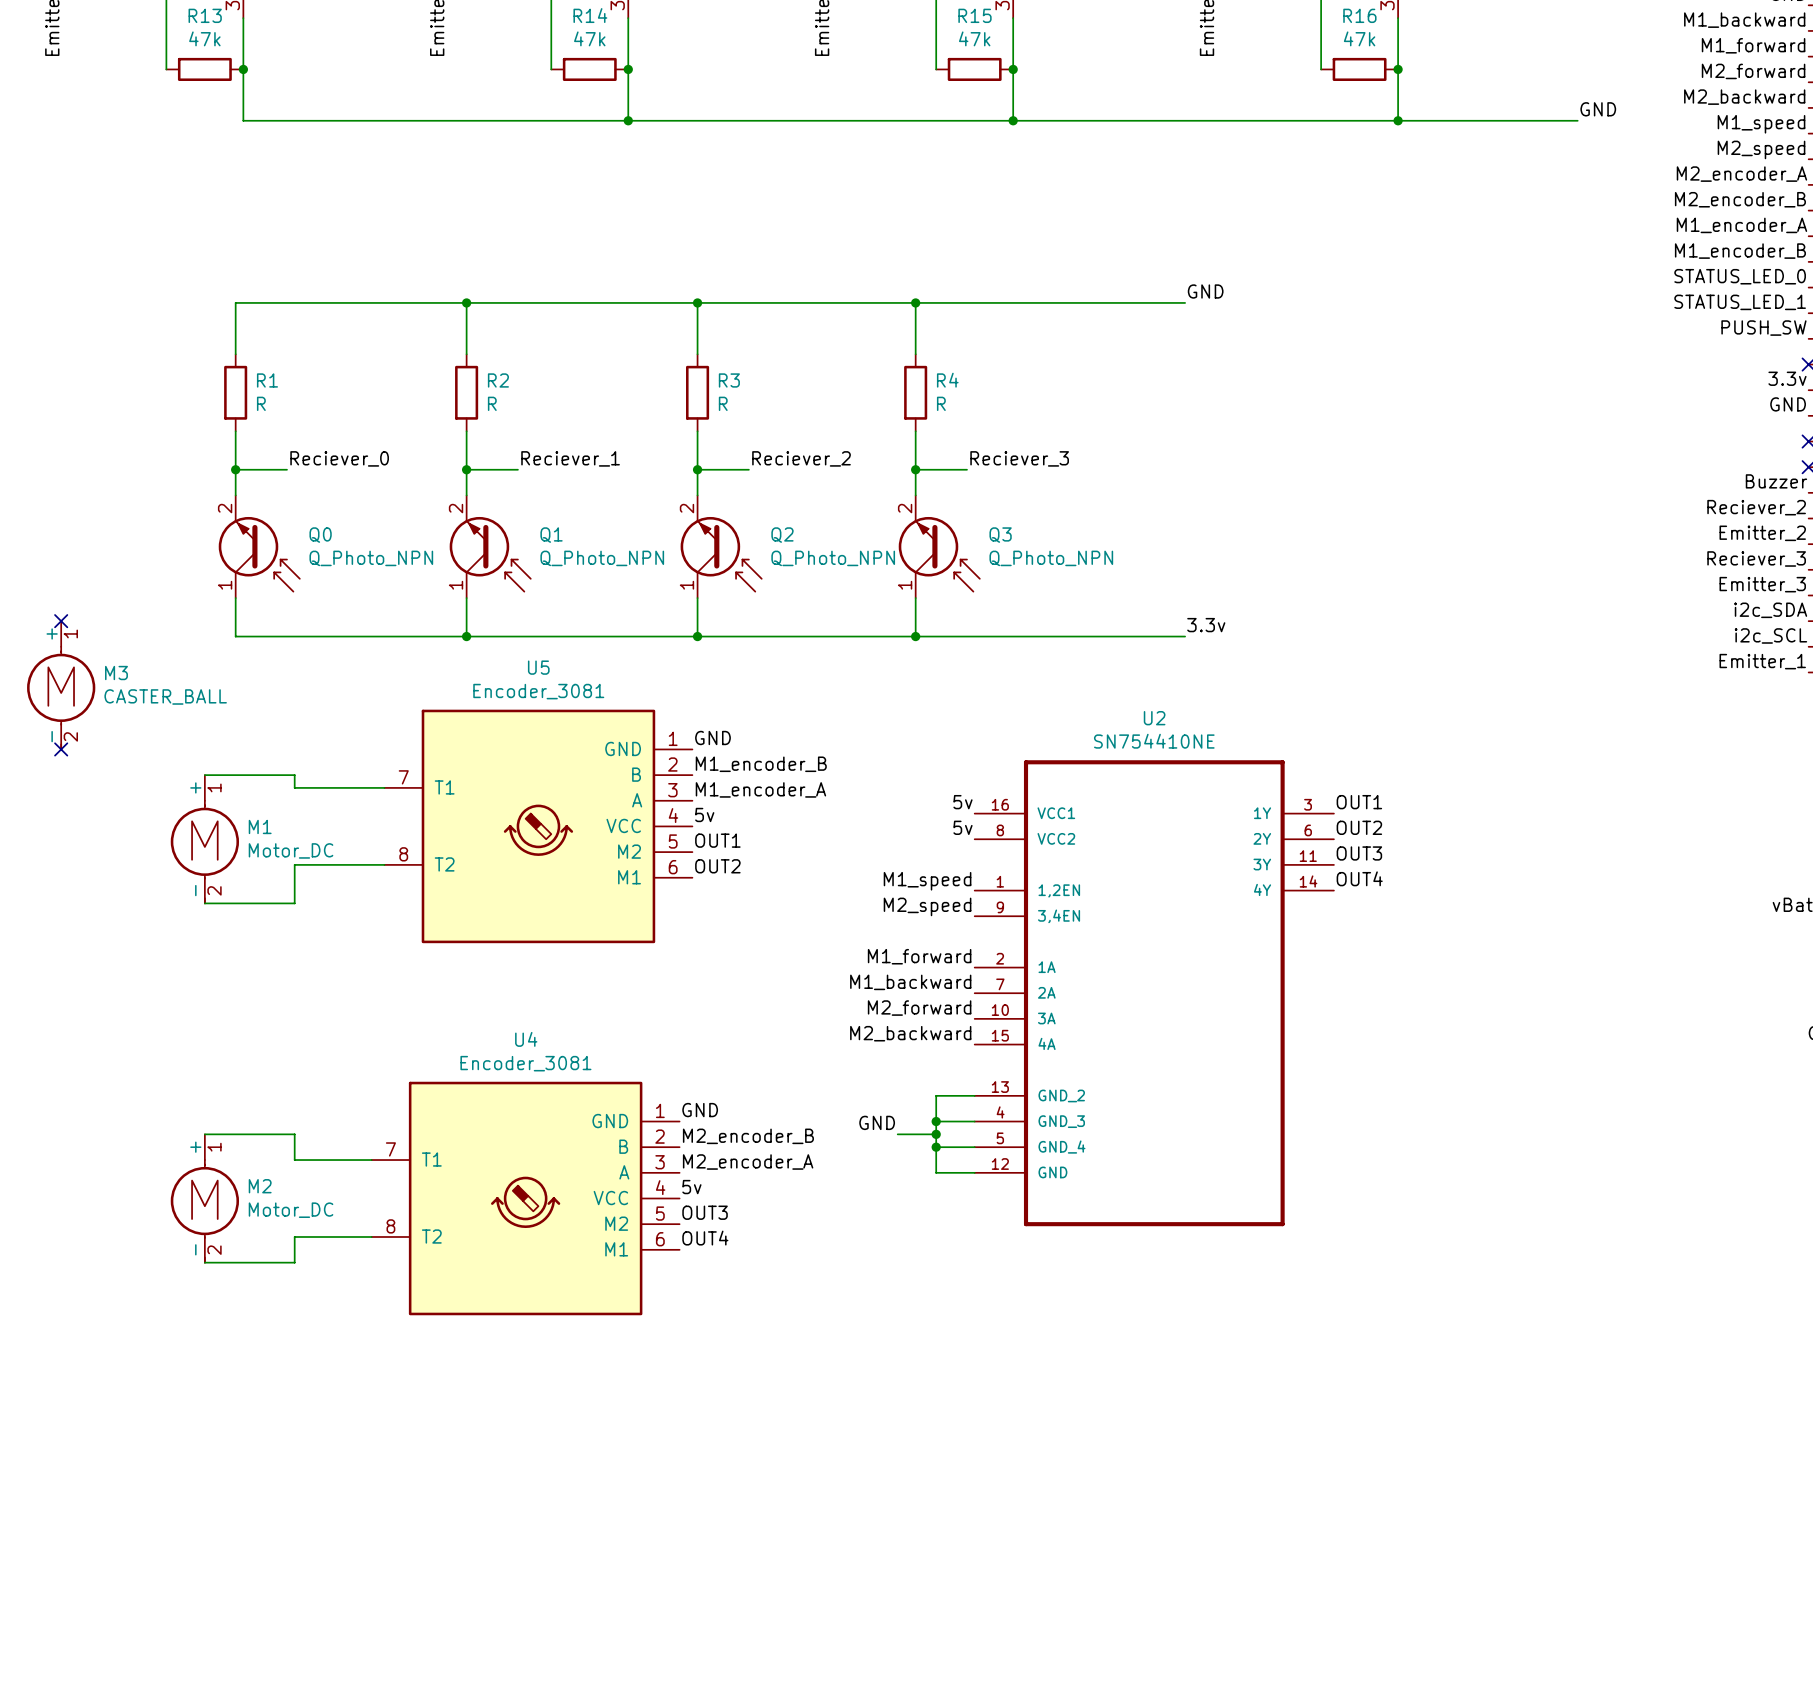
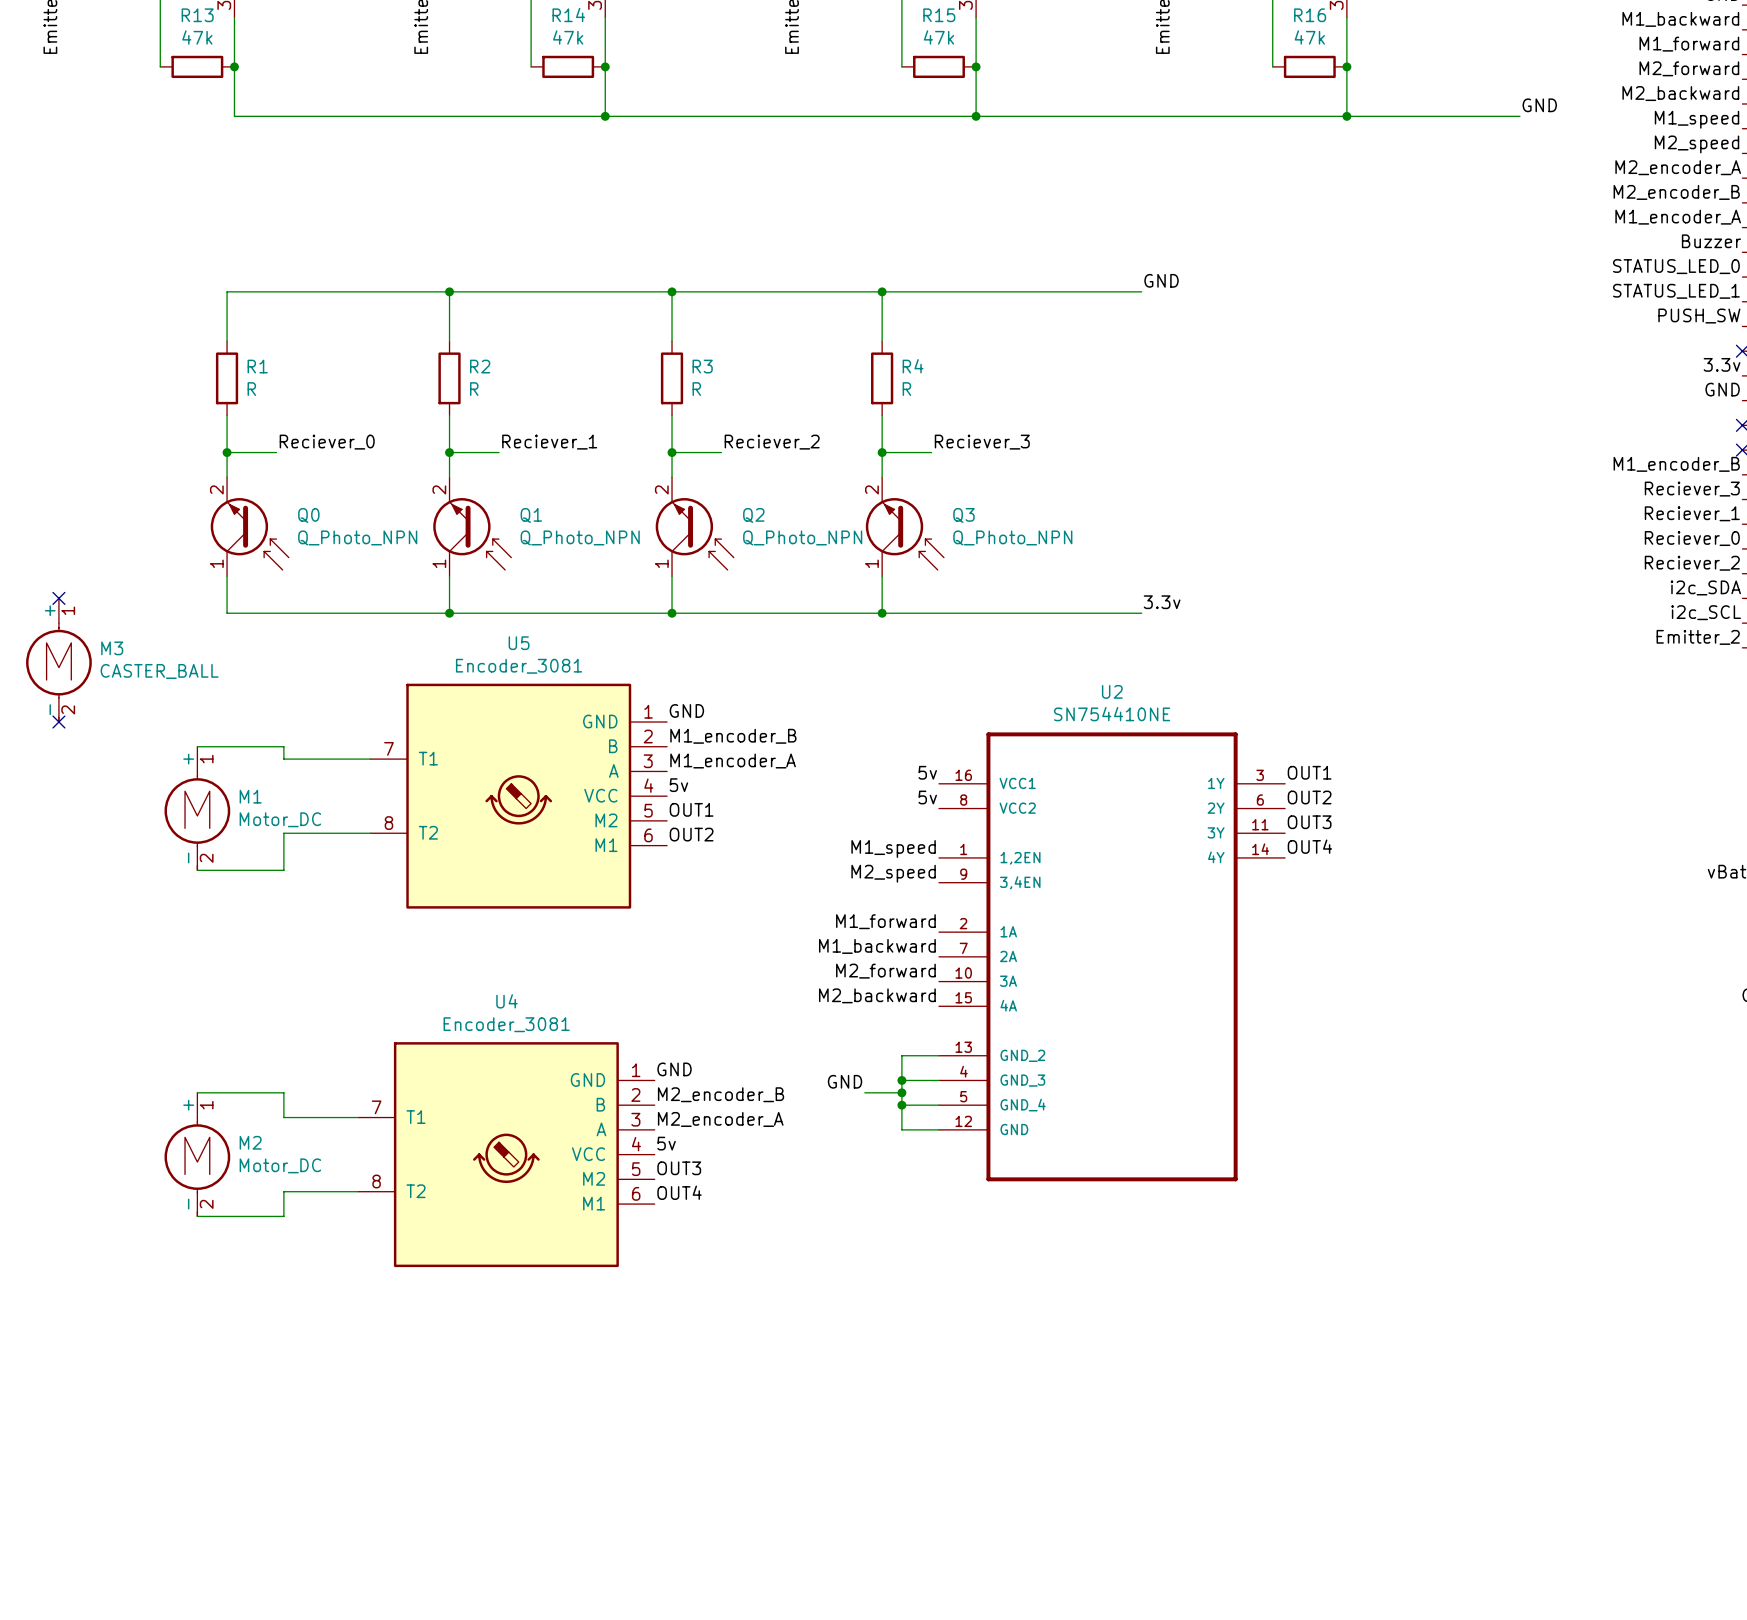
label: M1_encoder_B (1740, 251) -> Buzzer (1711, 241)
label: Buzzer (1776, 481) -> M1_encoder_B (1676, 464)
label: Reciever_2 (1756, 507) -> Reciever_3 (1692, 489)
label: Emitter_2 (1762, 533) -> Reciever_1 (1692, 513)
label: Reciever_3 (1756, 558) -> Reciever_0 (1692, 538)
label: Emitter_3 (1762, 584) -> Reciever_2 (1692, 563)
label: Emitter_1 (1762, 661) -> Emitter_2 (1698, 637)

